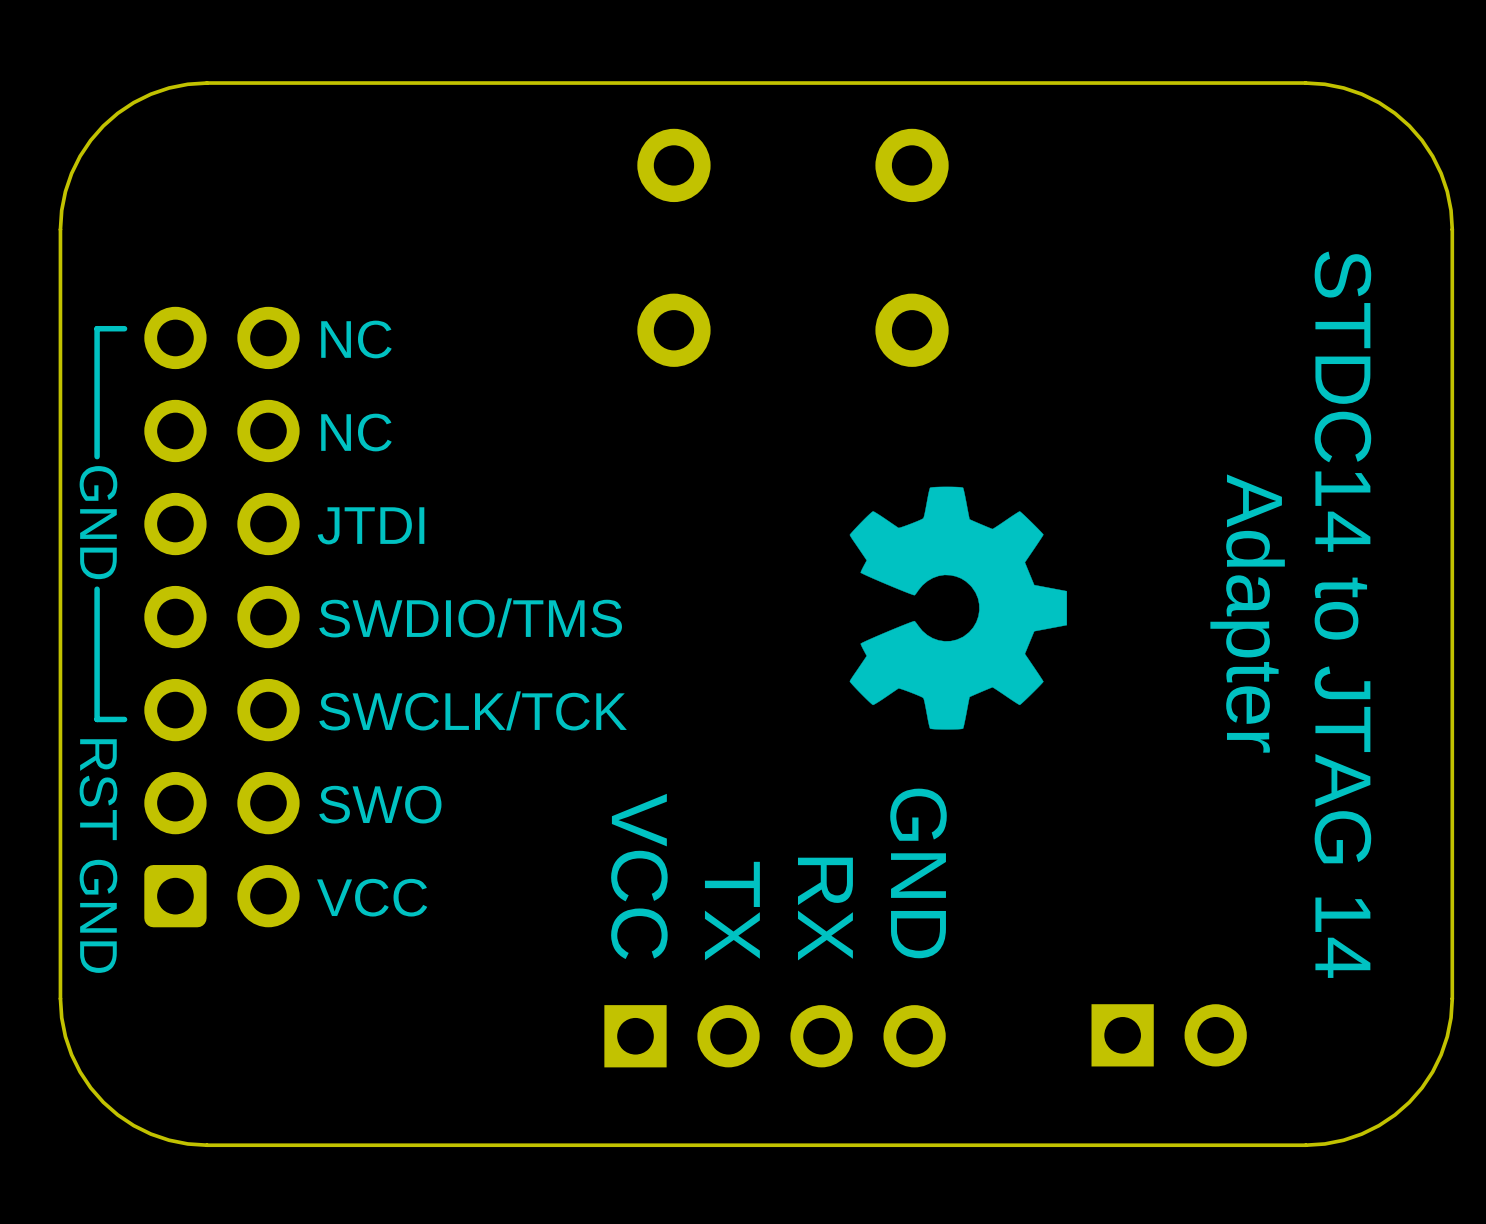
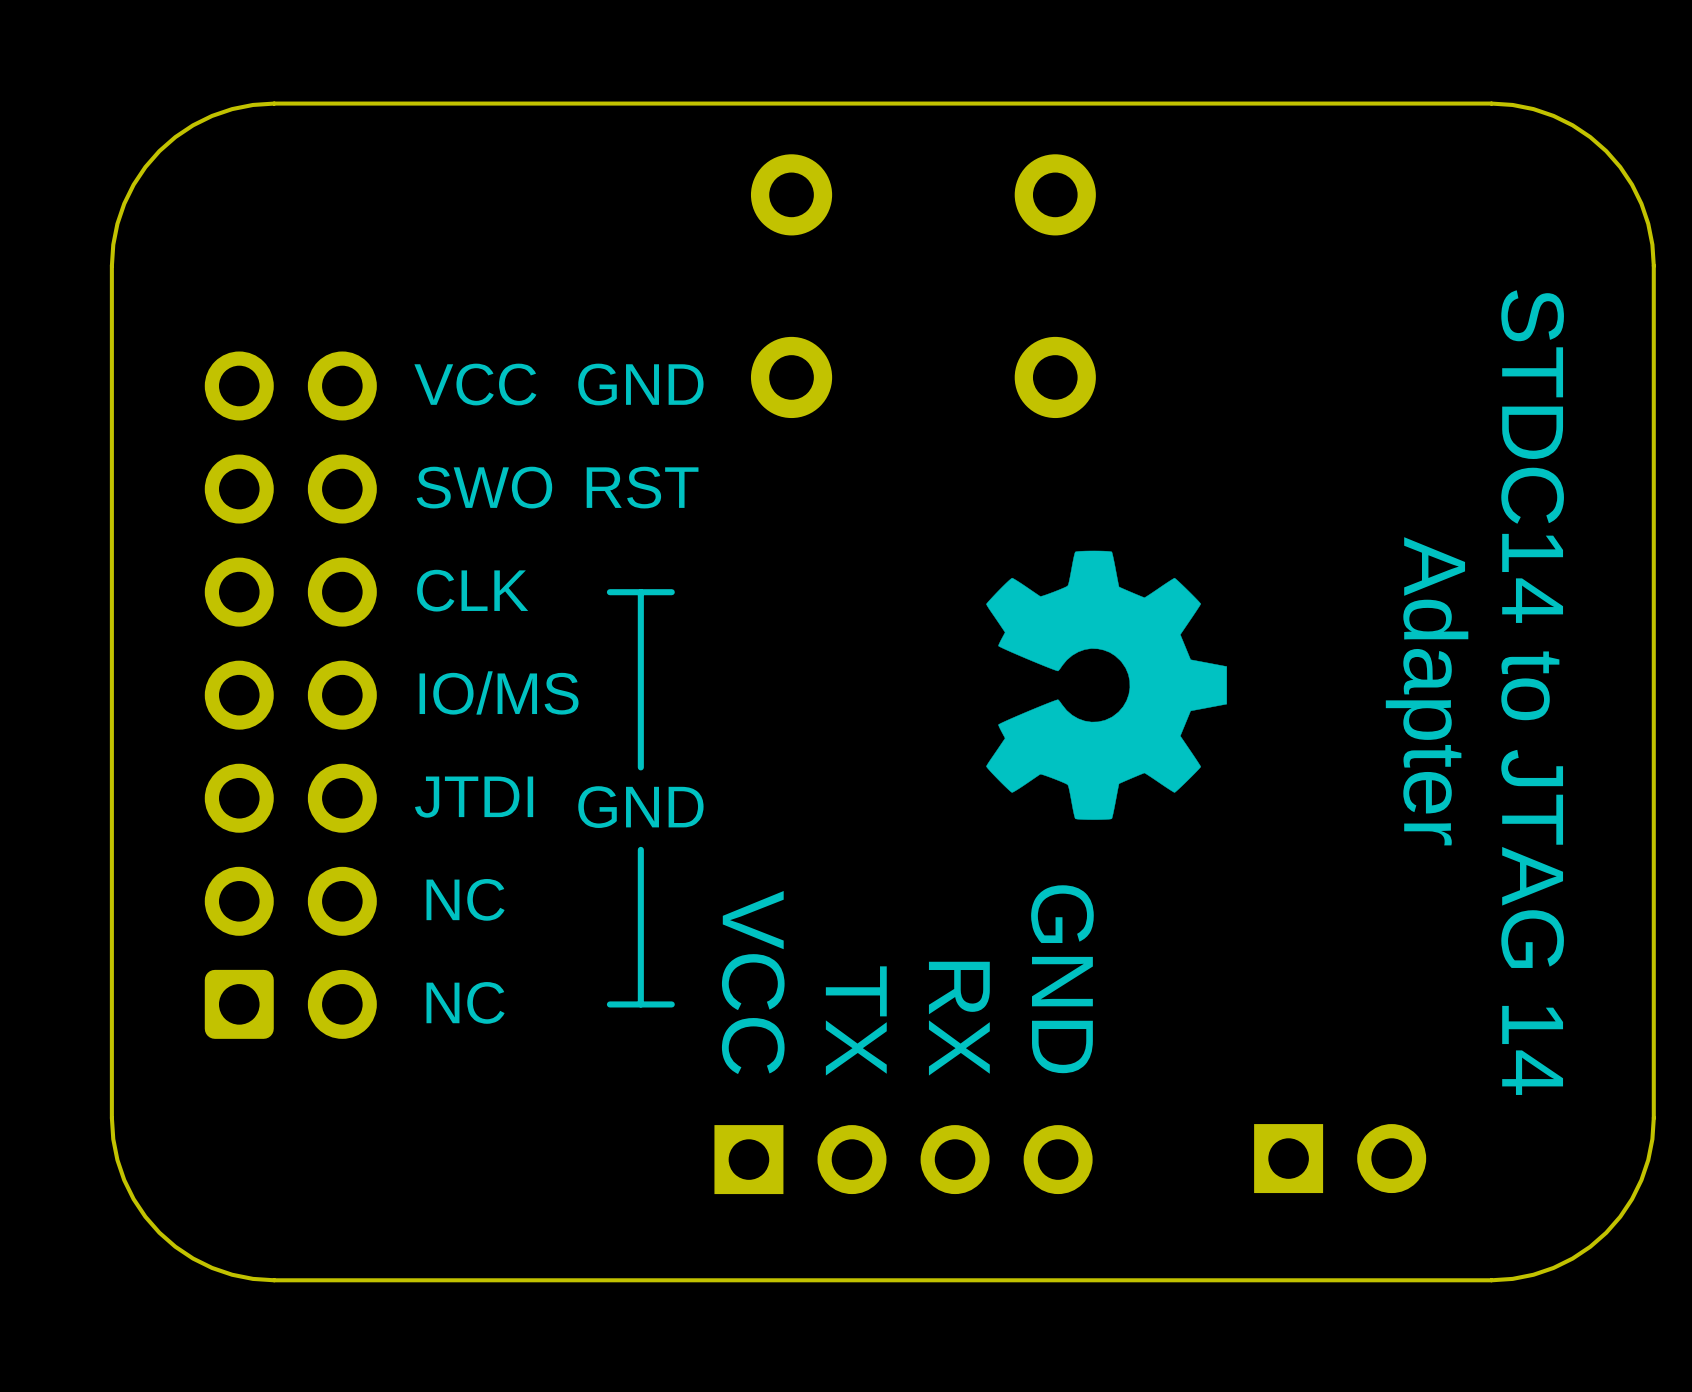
line: (124, 328) (97, 328) (97, 456) -> none
text: none -> GND (640, 384)
text: NC (356, 339) -> none
text: NC (356, 432) -> none
text: GND (98, 522) -> none
text: none -> CLK (472, 590)
line: none -> (640, 592) (640, 767)
line: none -> (671, 592) (609, 592)
text position: JTDI (370, 525) -> JTDI (474, 797)
line: (97, 589) (97, 719) (124, 719) -> none
text: SWDIO/TMS (470, 617) -> IO/MS (499, 692)
text: SWCLK/TCK (473, 710) -> none
text: none -> GND (640, 807)
line: none -> (640, 849) (640, 1004)
text rotation: 0° (98, 789) -> 90° counterclockwise (642, 487)
text position: RST (98, 789) -> RST (642, 487)
text: none -> NC (465, 899)
text position: SWO (380, 804) -> SWO (484, 487)
text: none -> NC (465, 1002)
line: none -> (671, 1004) (609, 1004)
text position: VCC (372, 897) -> VCC (475, 384)
text: GND (98, 916) -> none

